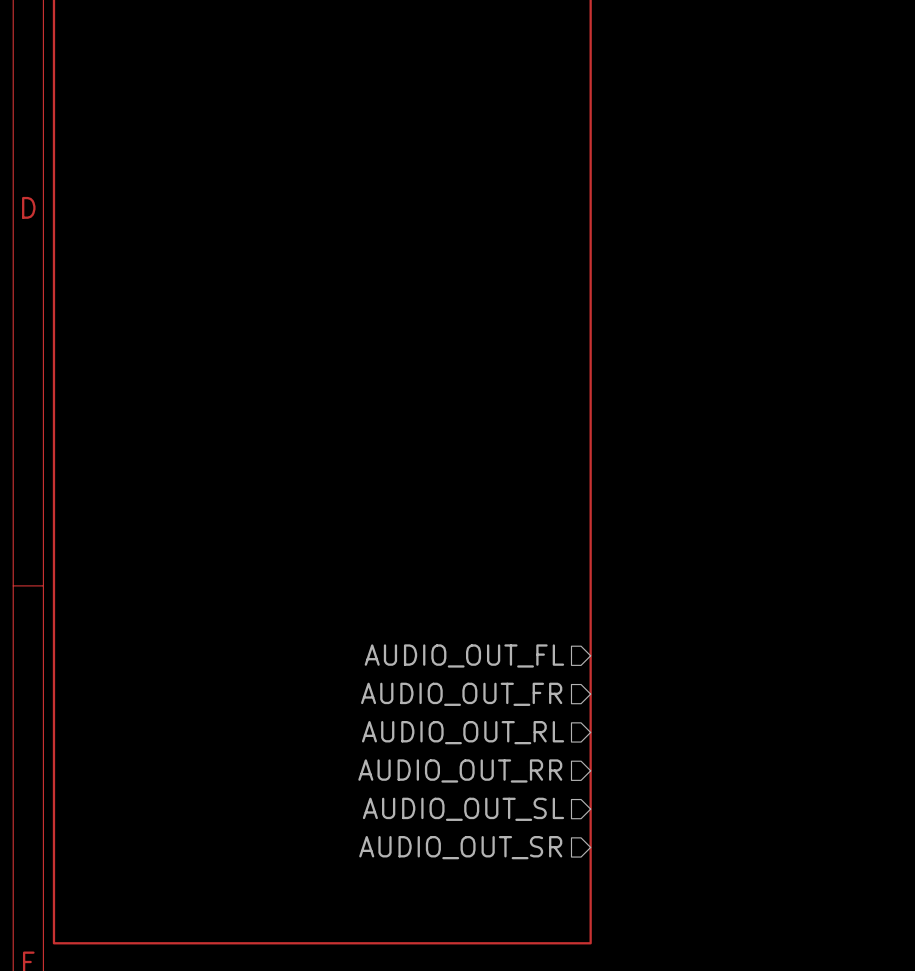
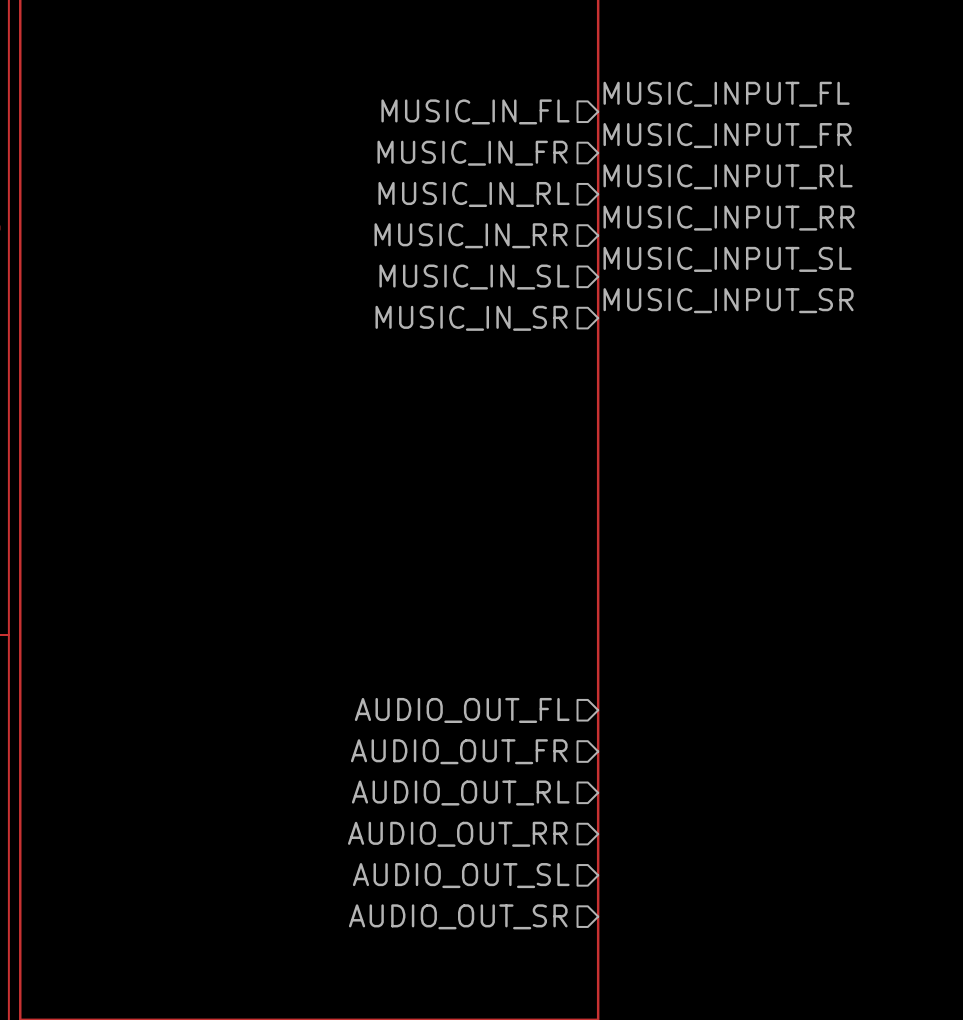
label: none -> MUSIC_INPUT_FL (726, 94)
sheet pin: none -> MUSIC_IN_FL (475, 111)
label: none -> MUSIC_INPUT_FR (727, 135)
sheet pin: none -> MUSIC_IN_FR (472, 153)
label: none -> MUSIC_INPUT_RL (728, 176)
sheet pin: none -> MUSIC_IN_RL (474, 194)
label: none -> MUSIC_INPUT_RR (729, 218)
sheet pin: none -> MUSIC_IN_RR (471, 235)
label: none -> MUSIC_INPUT_SL (727, 259)
sheet pin: none -> MUSIC_IN_SL (474, 277)
label: none -> MUSIC_INPUT_SR (728, 300)
sheet pin: none -> MUSIC_IN_SR (471, 318)

